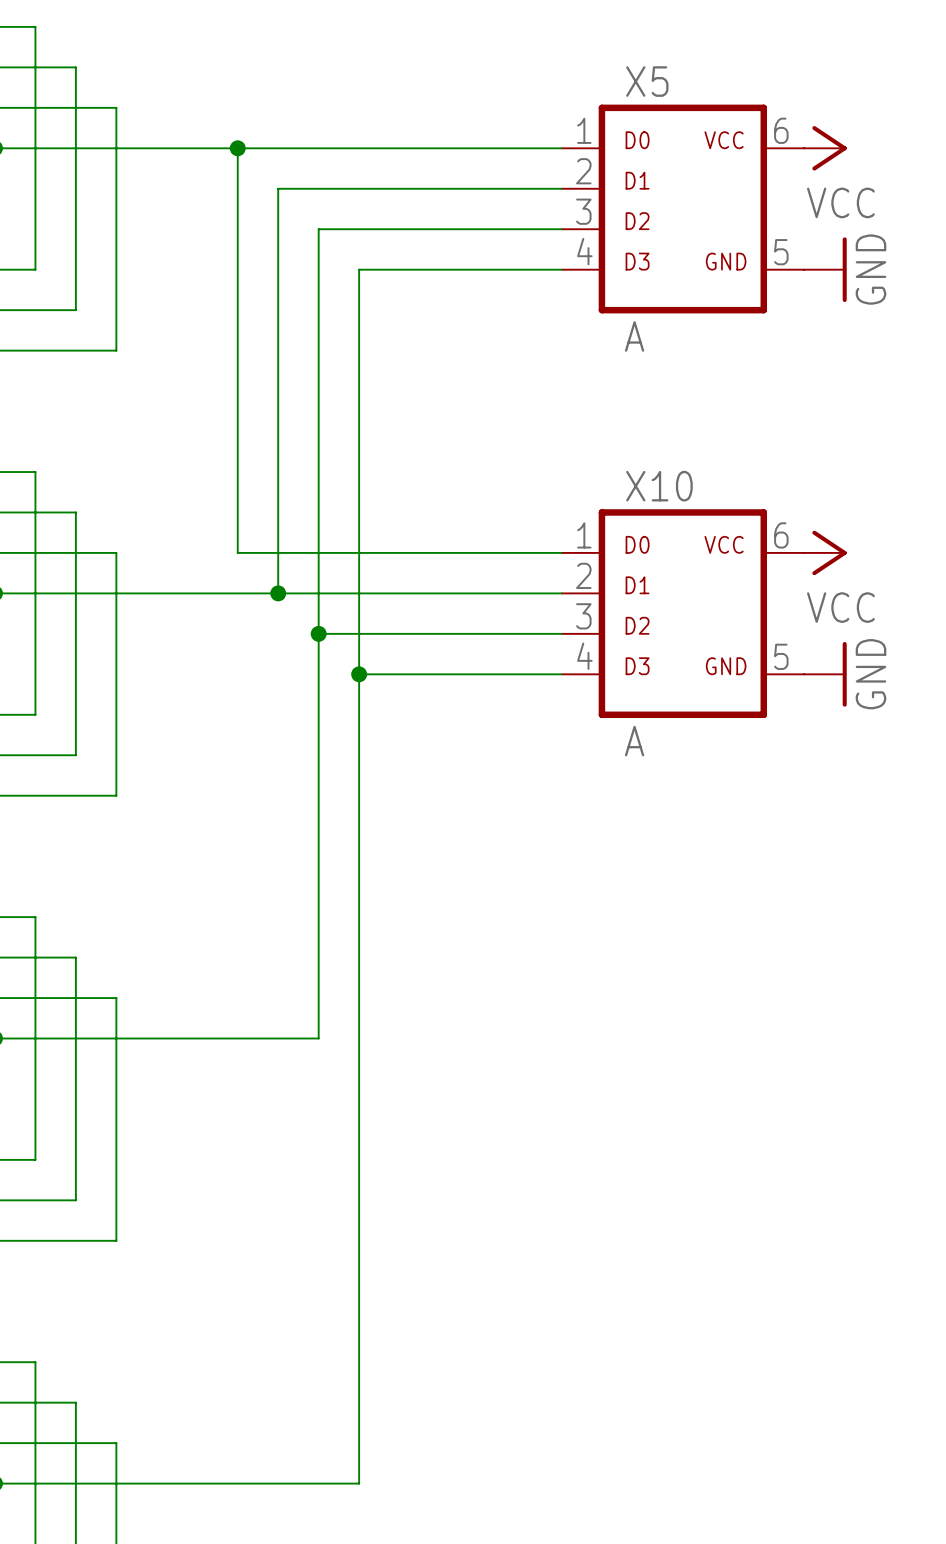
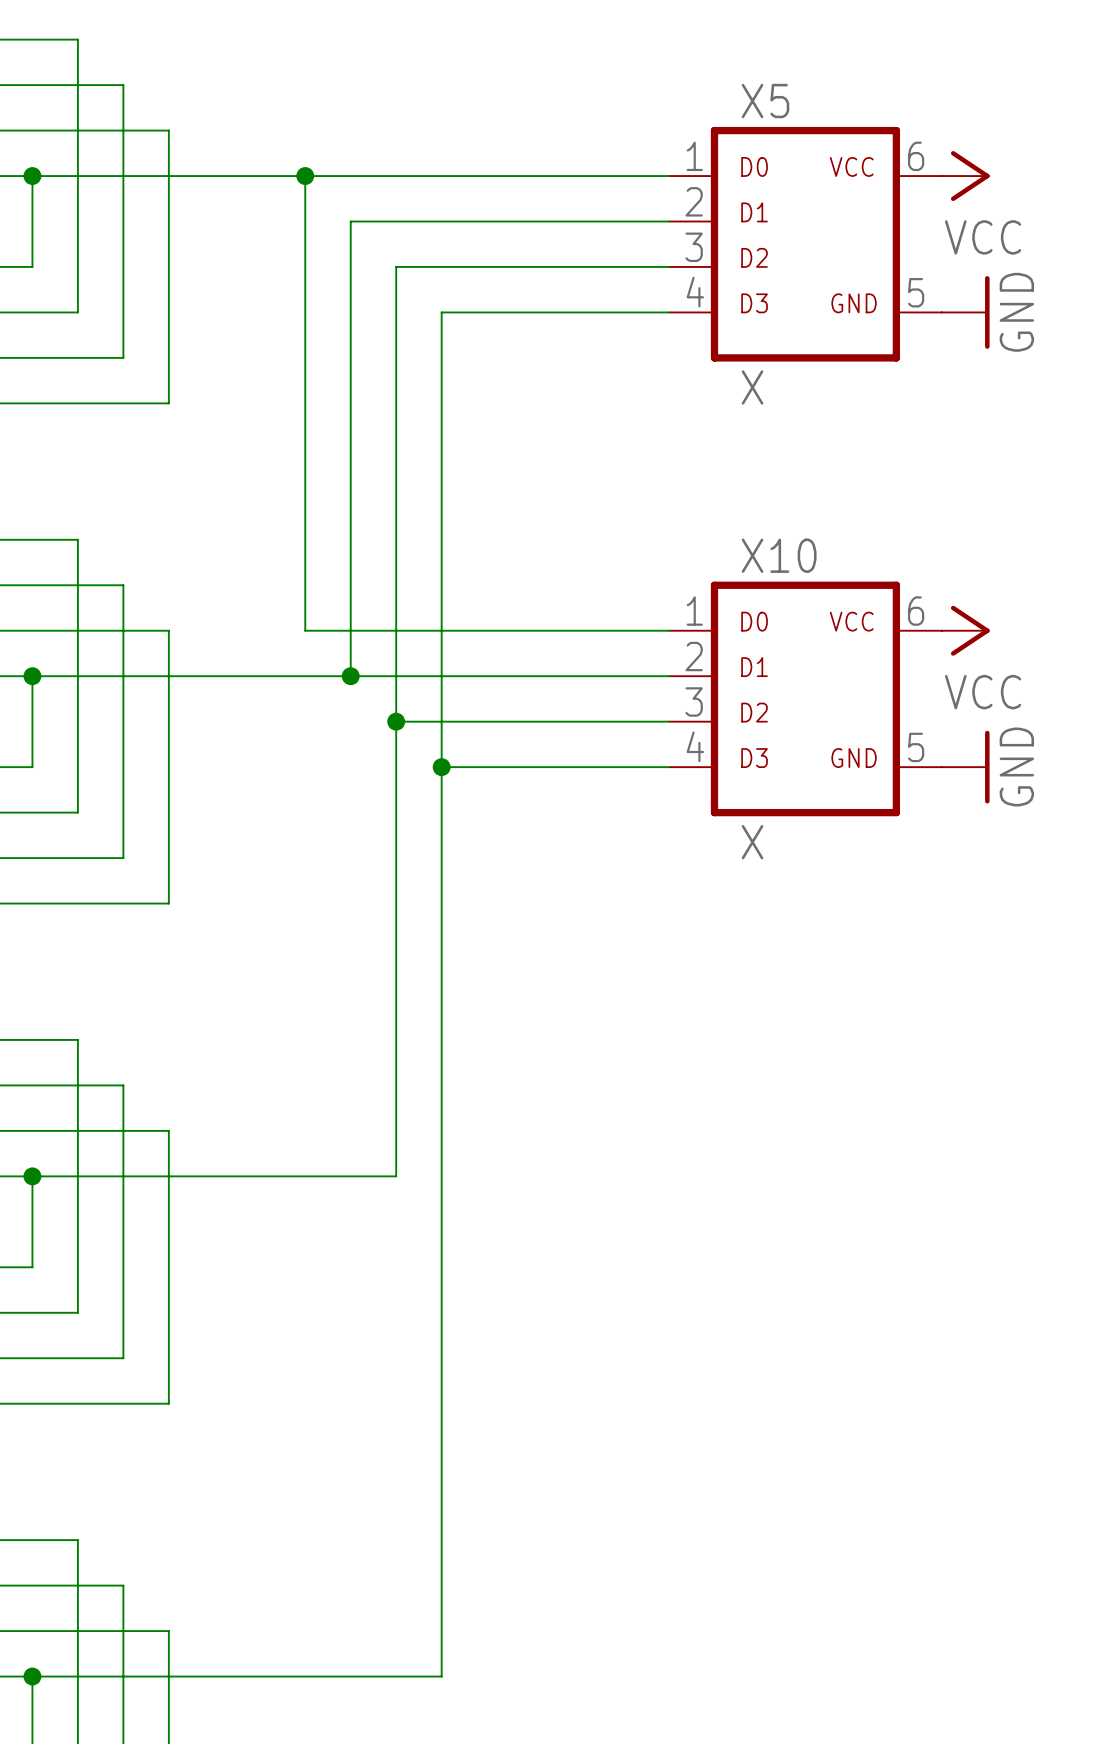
X5 value: A (634, 336) -> X (752, 387)
X10 value: A (634, 741) -> X (752, 842)

